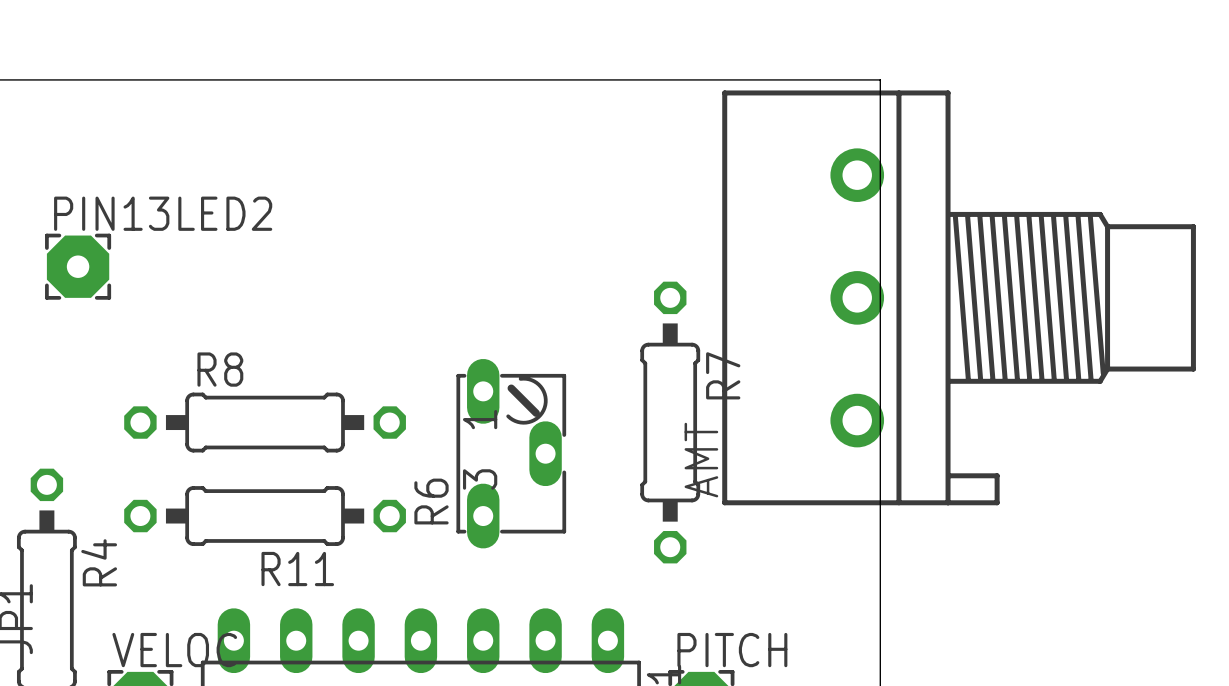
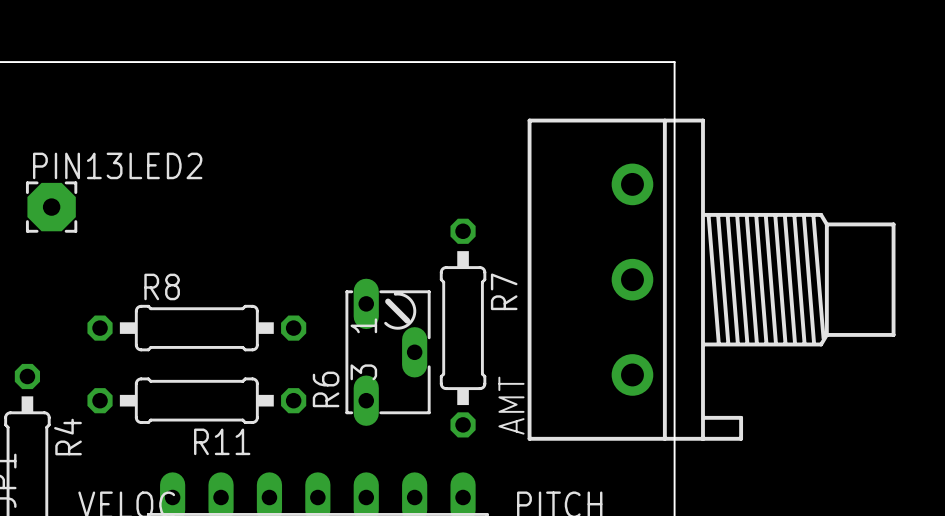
AMT position: (959, 297) -> (711, 279)
R7 position: (670, 422) -> (463, 328)

